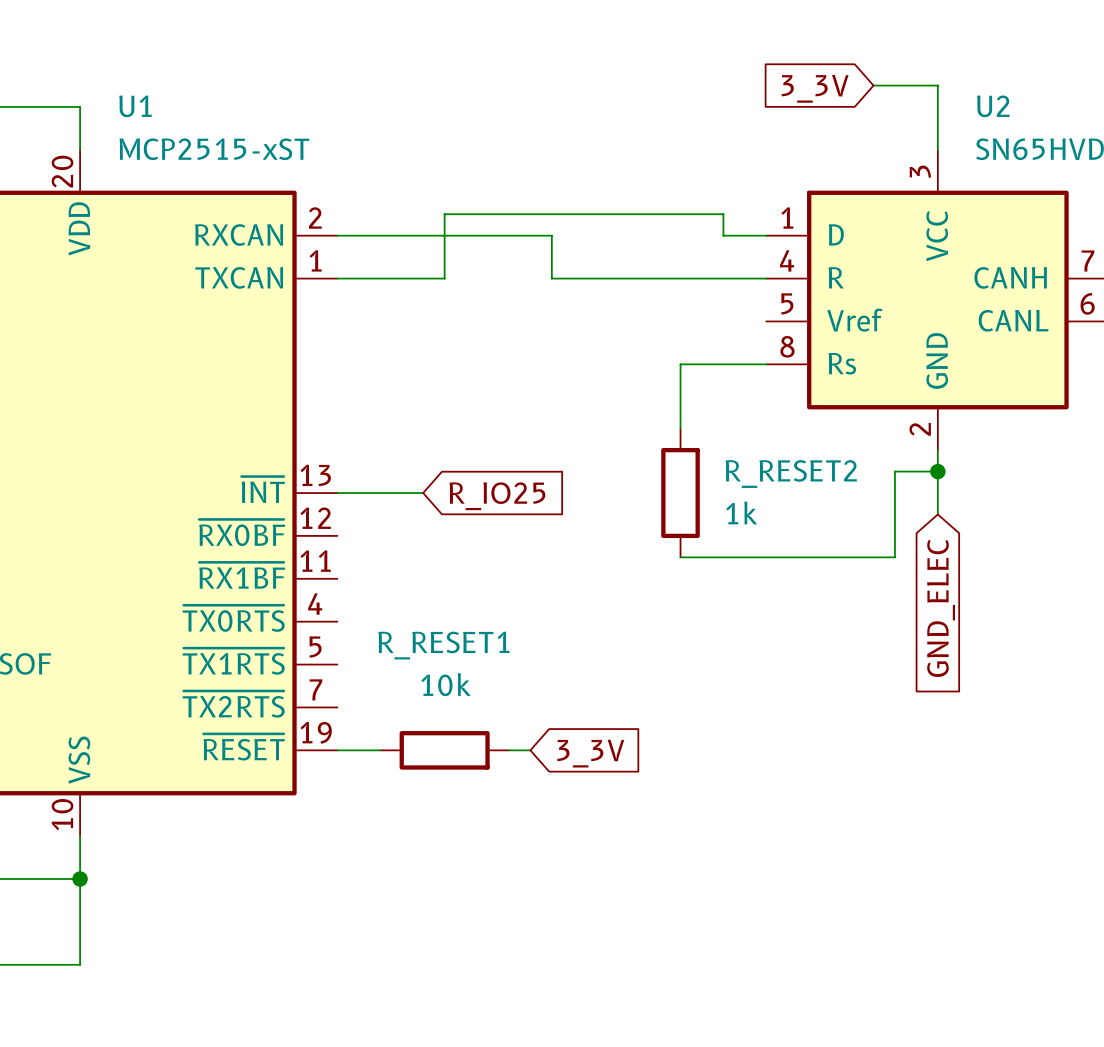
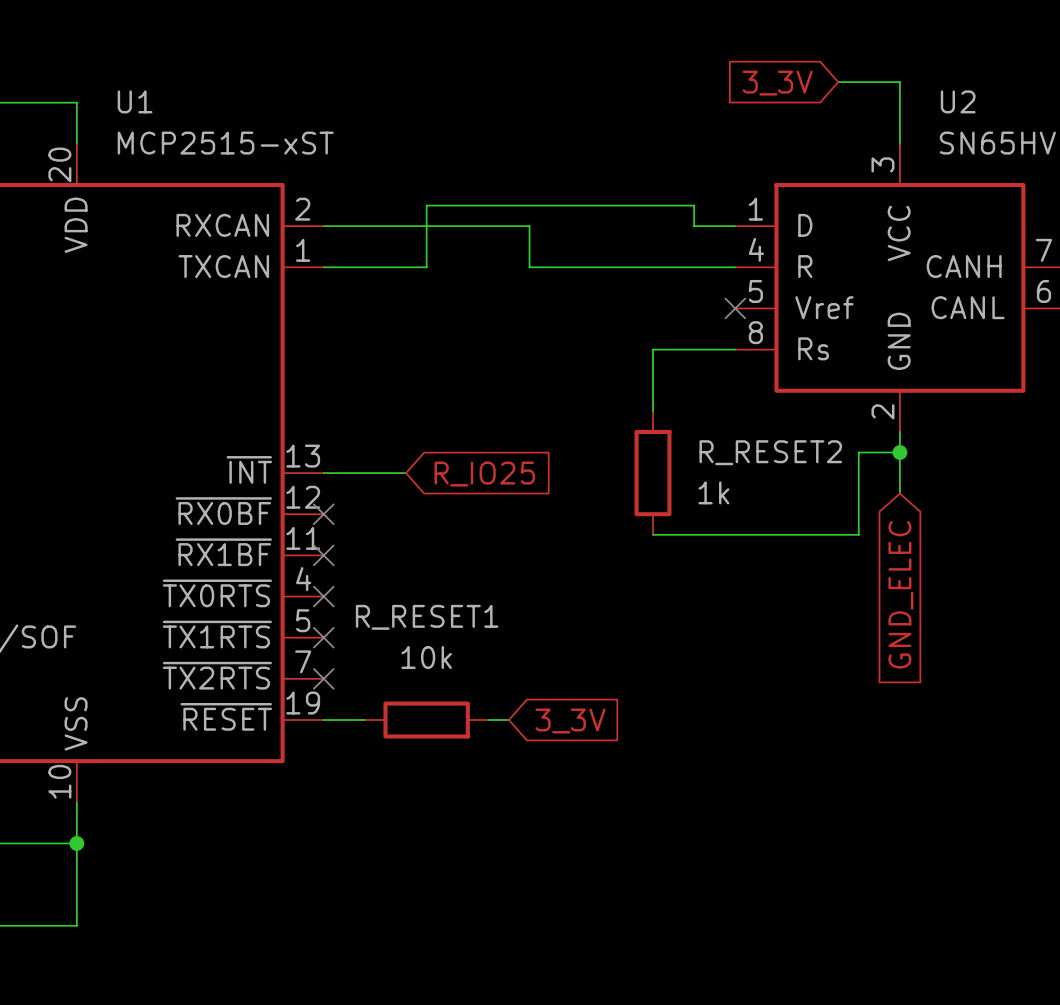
no-connect mark: none -> (735, 308)
no-connect mark: none -> (323, 514)
no-connect mark: none -> (323, 555)
no-connect mark: none -> (323, 596)
no-connect mark: none -> (323, 637)
no-connect mark: none -> (323, 678)

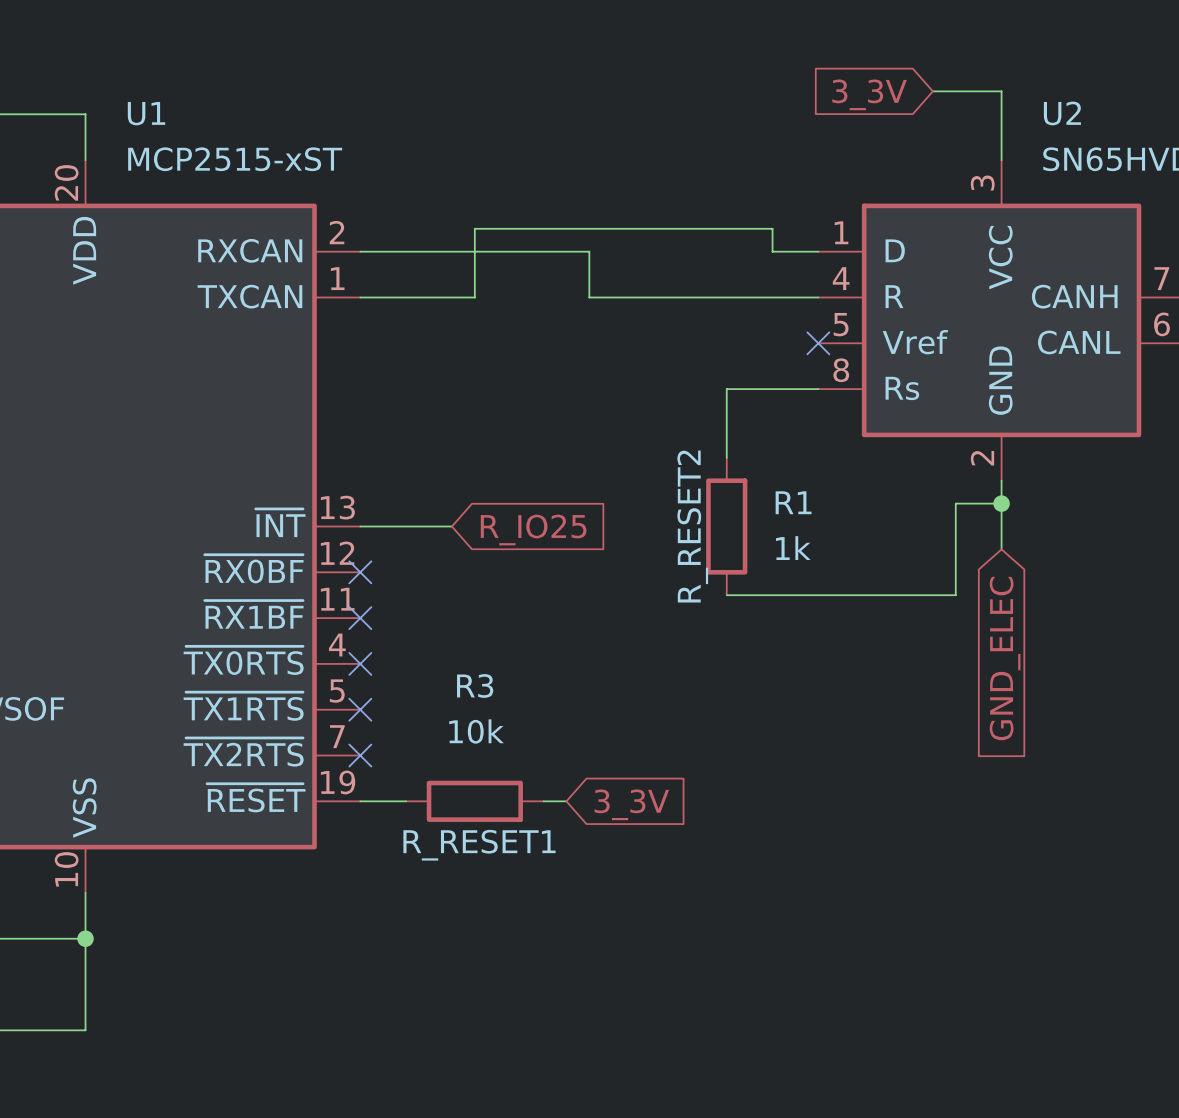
R_RESET2 name: R_RESET2 (770, 452) -> R1 (793, 502)
R_RESET2 text: none -> R_RESET2 (692, 526)
R_RESET1 name: R_RESET1 (427, 617) -> R3 (475, 685)
R_RESET1 text: none -> R_RESET1 (479, 845)

